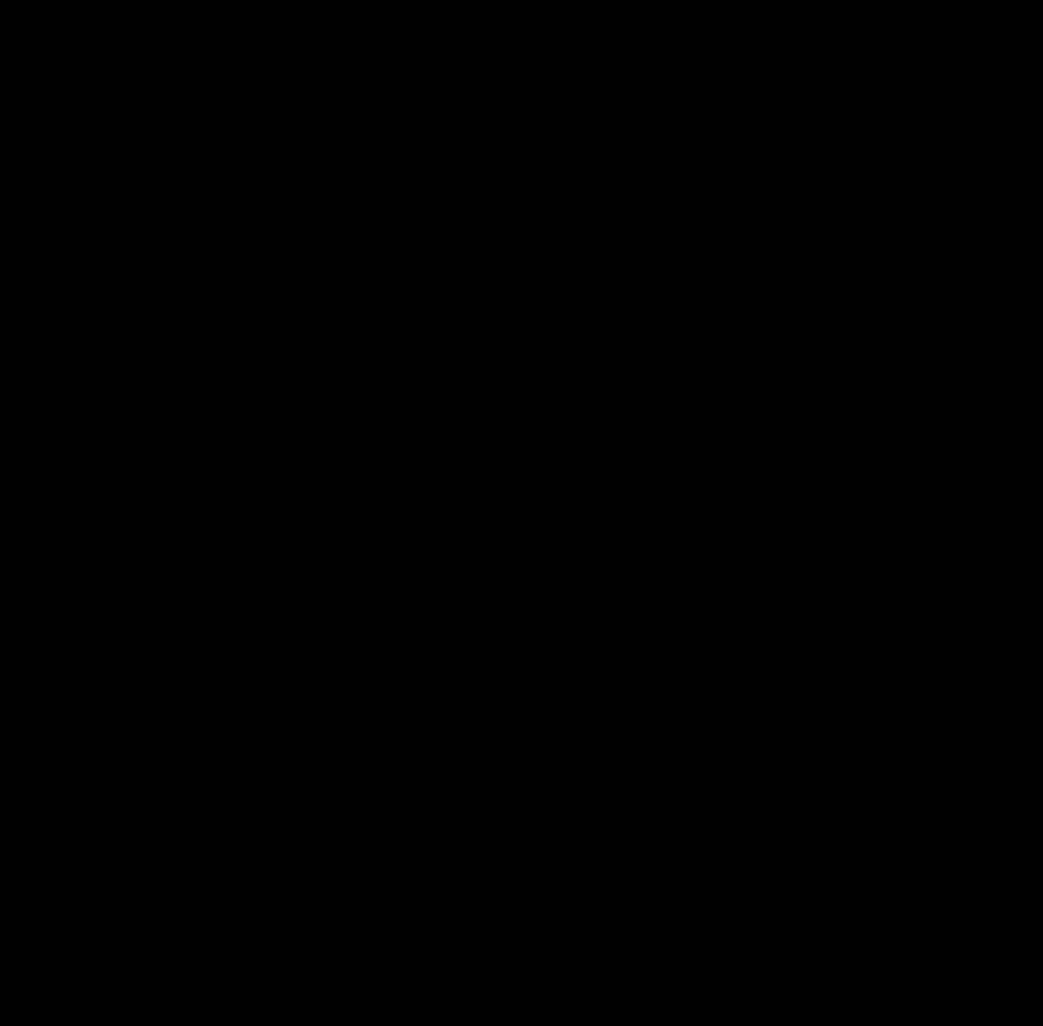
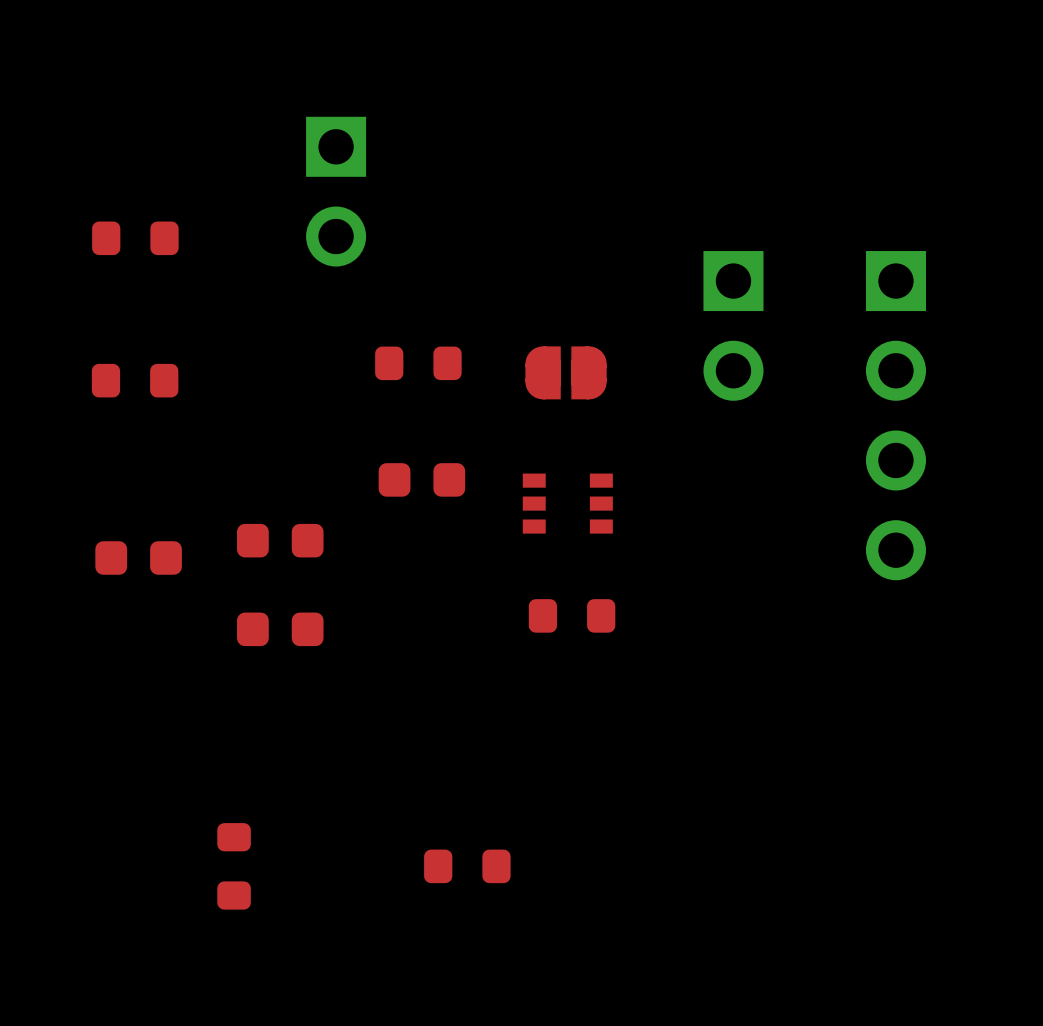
part: none -> (336, 191)
part: none -> (135, 238)
part: none -> (733, 325)
part: none -> (418, 363)
part: none -> (566, 372)
part: none -> (135, 380)
part: none -> (895, 415)
part: none -> (421, 479)
part: none -> (567, 503)
part: none -> (280, 540)
part: none -> (138, 557)
part: none -> (572, 615)
part: none -> (280, 629)
part: none -> (234, 866)
part: none -> (467, 866)

